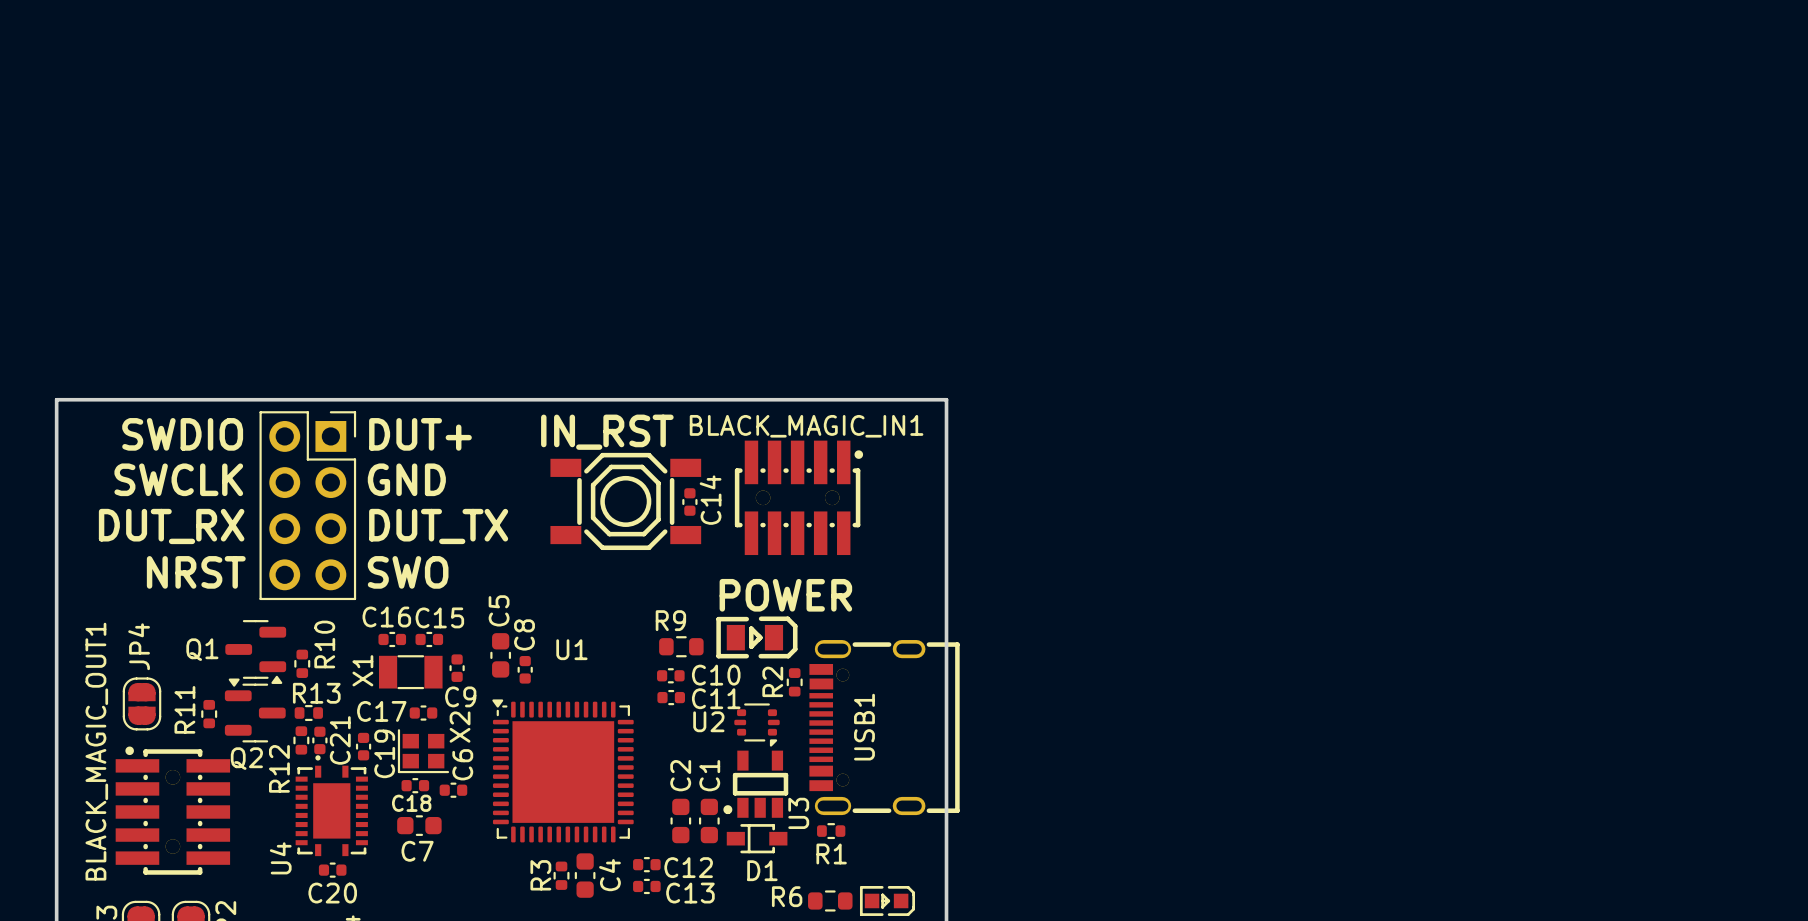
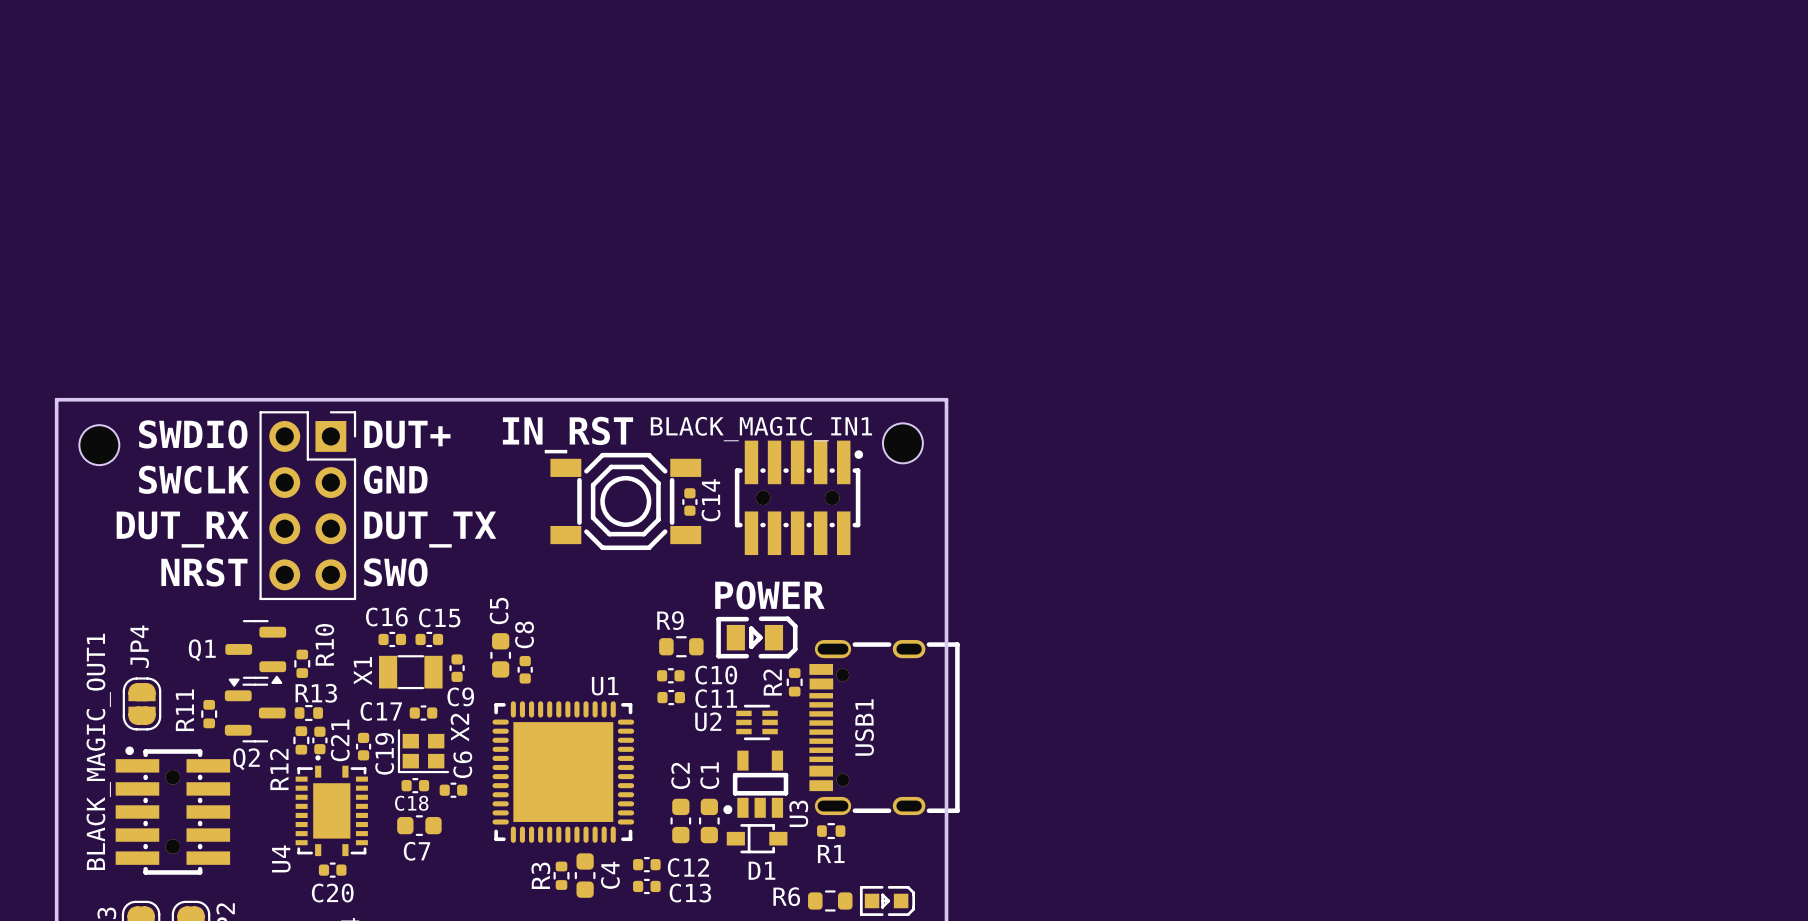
BLACK_MAGIC_IN1 name position: BLACK_MAGIC_IN1 (806, 426) -> BLACK_MAGIC_IN1 (761, 429)
text position: IN_RST (607, 432) -> IN_RST (568, 435)
part: none -> (902, 443)
part: none -> (99, 445)
U1 name position: U1 (571, 649) -> U1 (605, 686)
U1 footprint: [492, 699, 634, 843] -> [484, 701, 635, 843]
U2 footprint: [734, 703, 780, 747] -> [736, 704, 779, 743]

